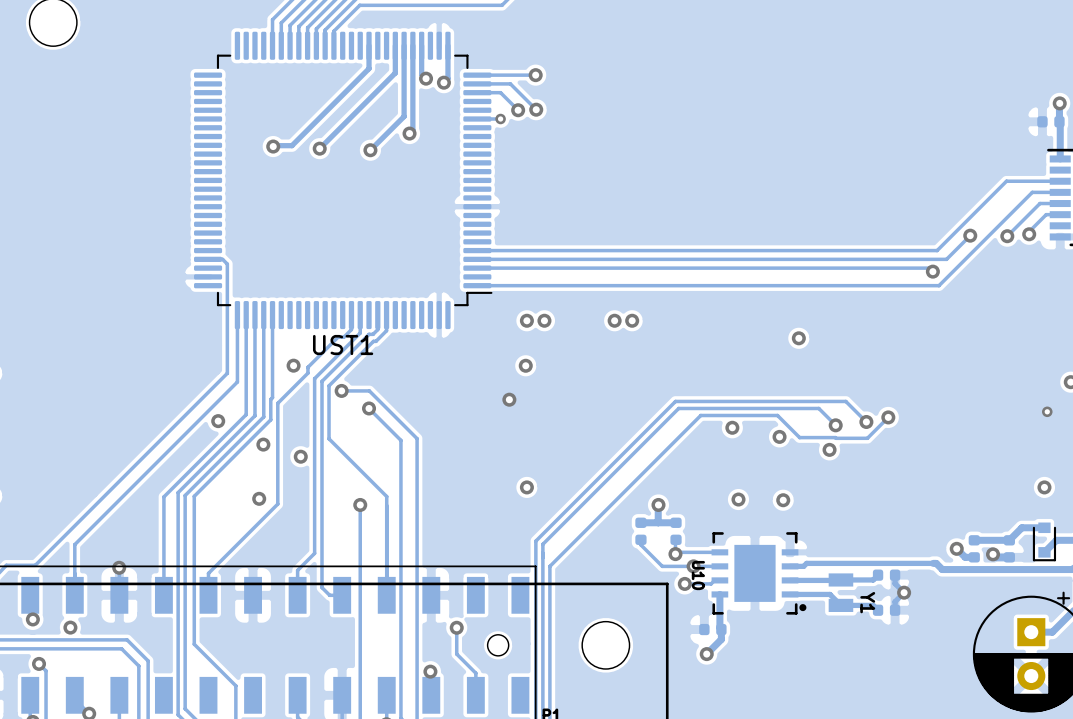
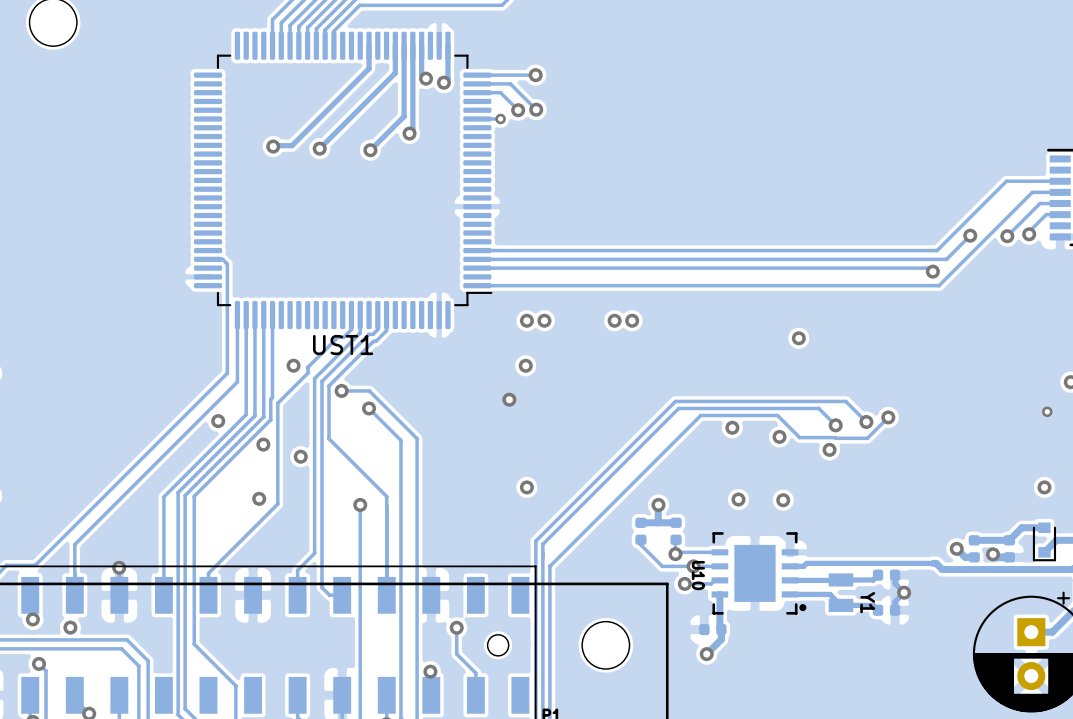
track: (1059, 103) (1060, 158) -> none
via: (1059, 103) -> none
part: (1050, 121) -> none

